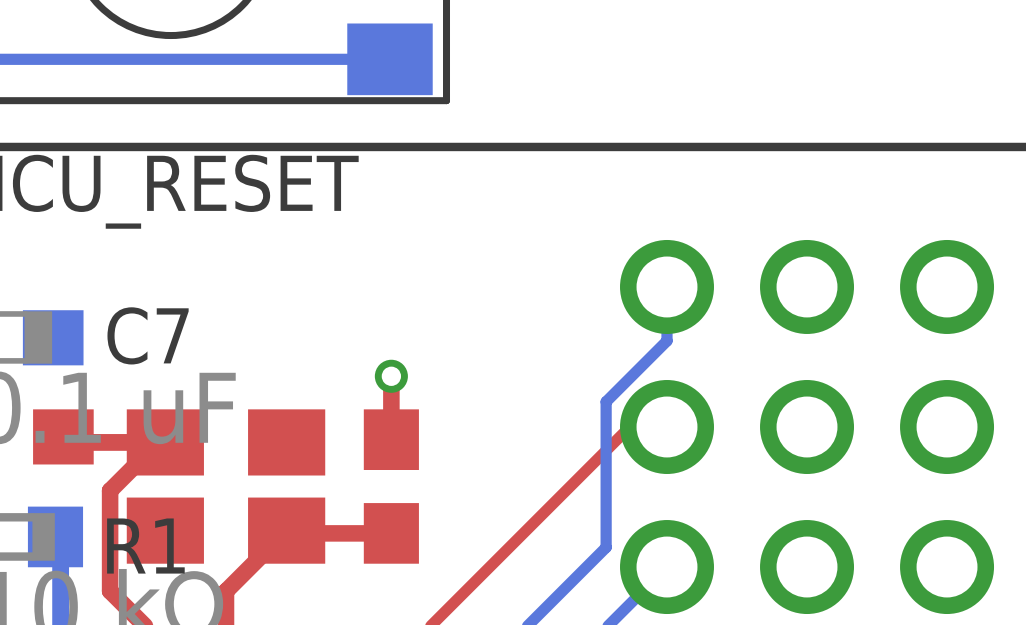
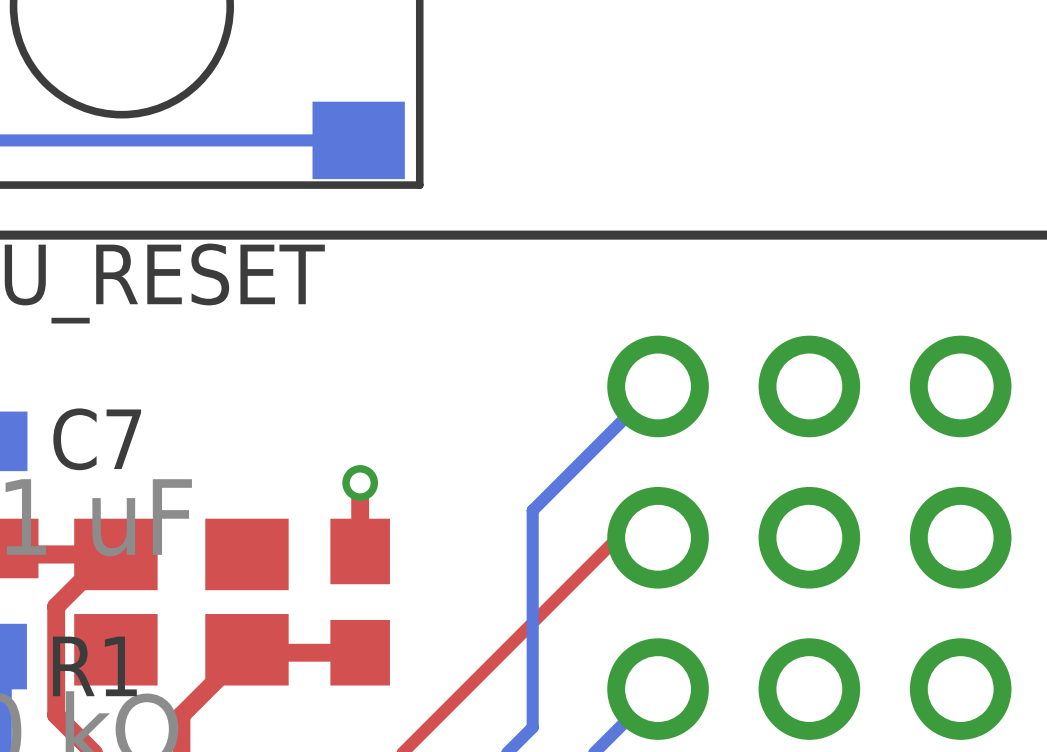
bottom track: (667, 286) (667, 340) (606, 401) (606, 547) (551, 602) -> (658, 386) (532, 510) (532, 727)

